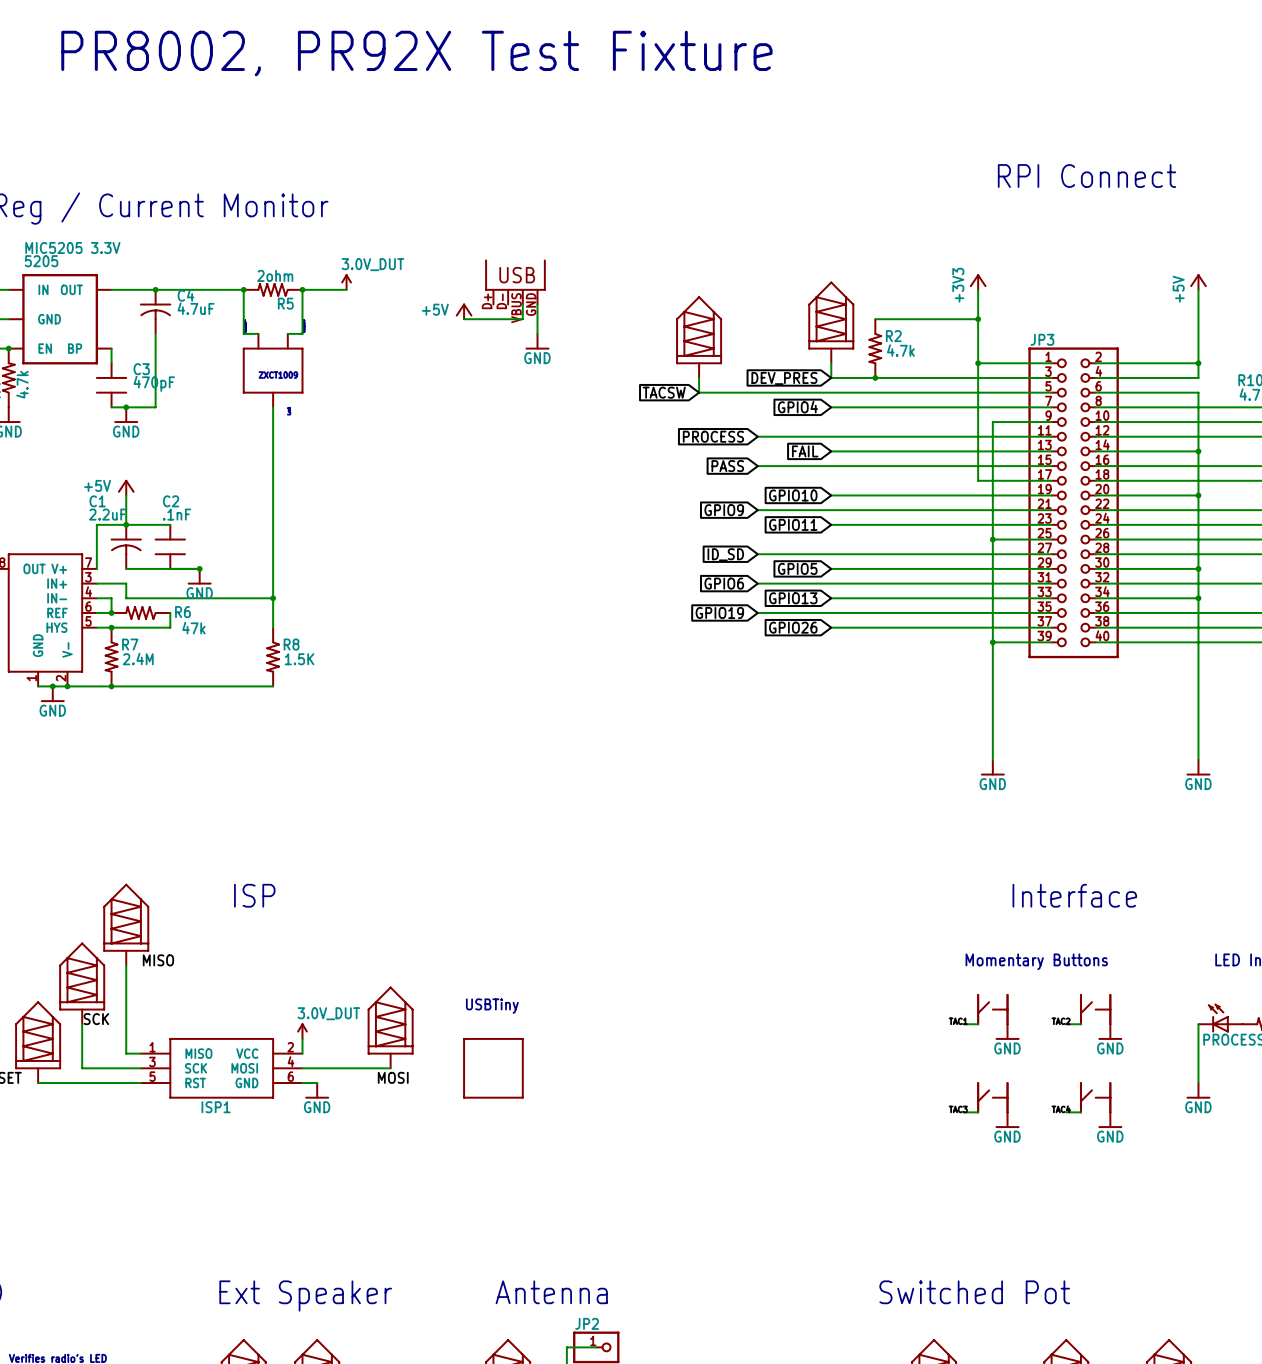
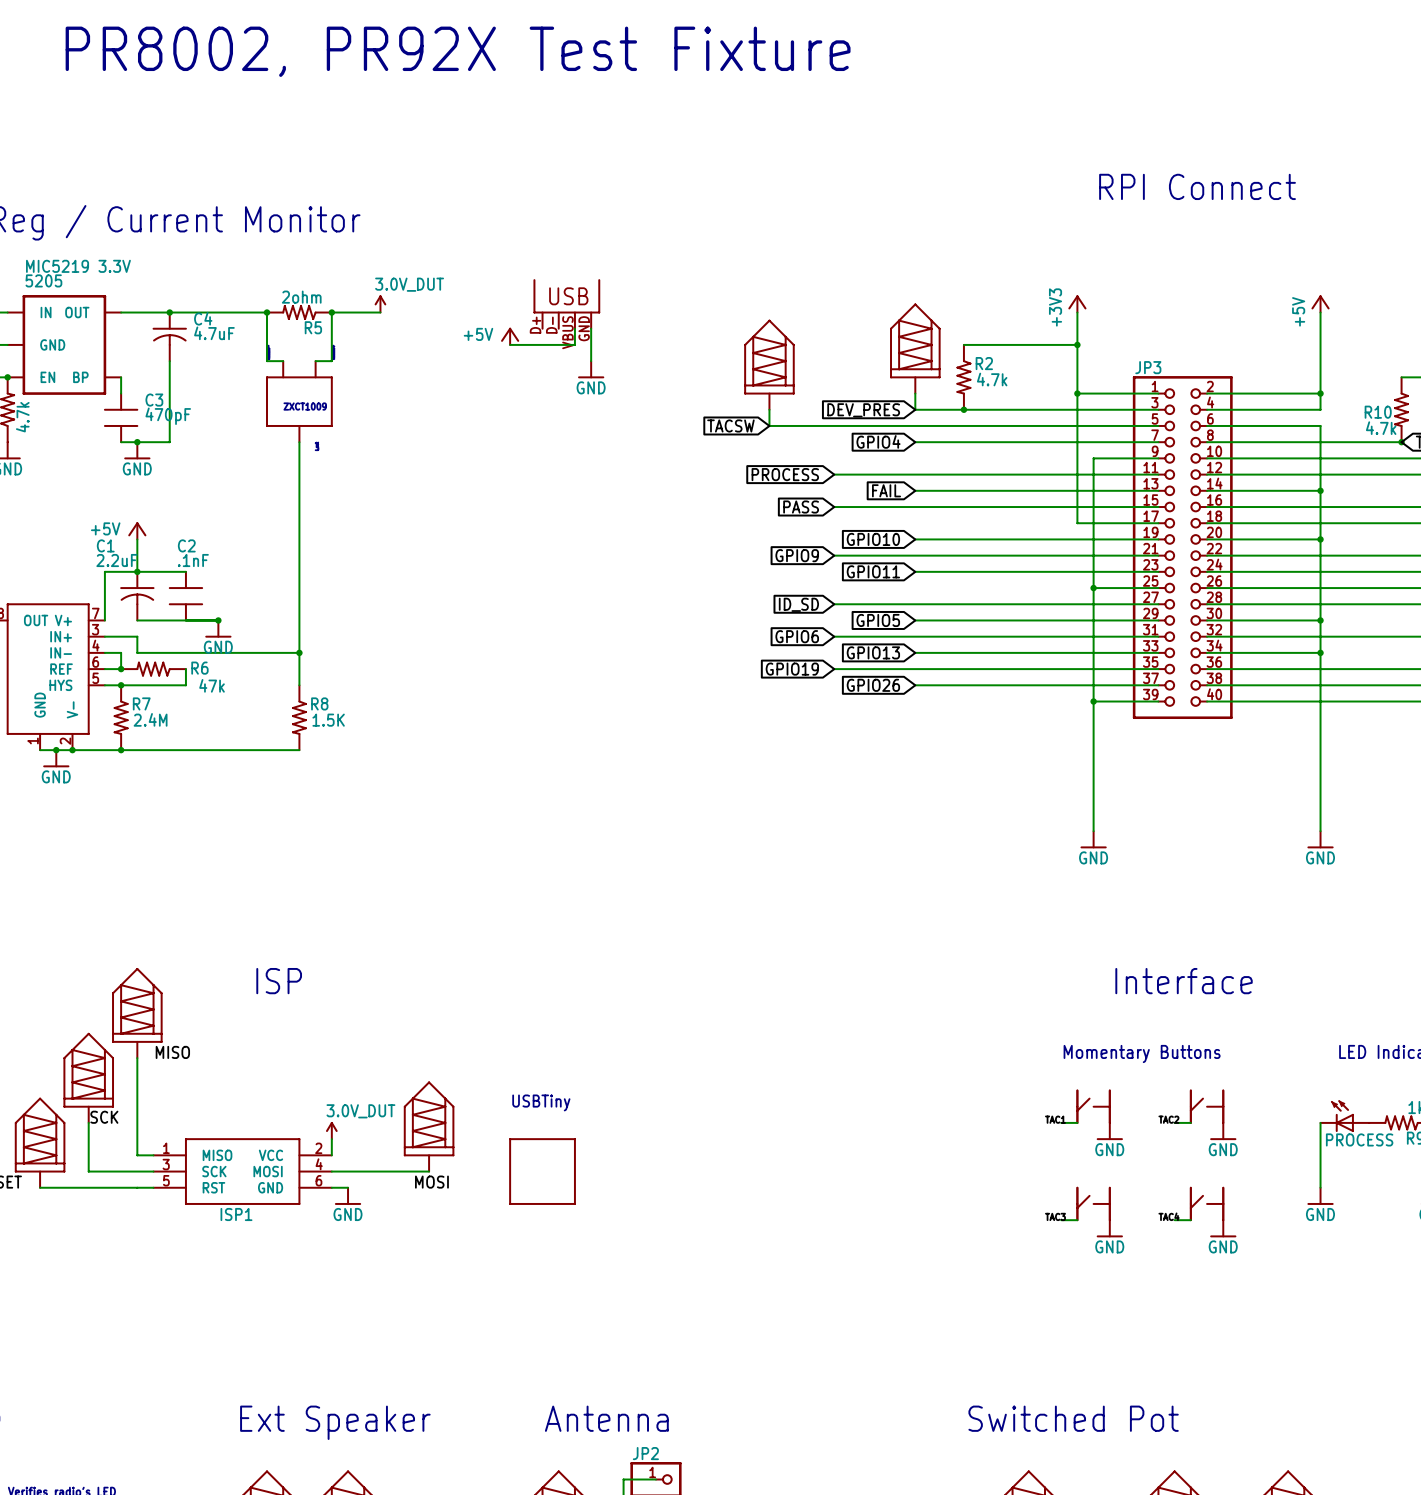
5205 value: MIC5205 3.3V (72, 247) -> MIC5219 3.3V (78, 266)

